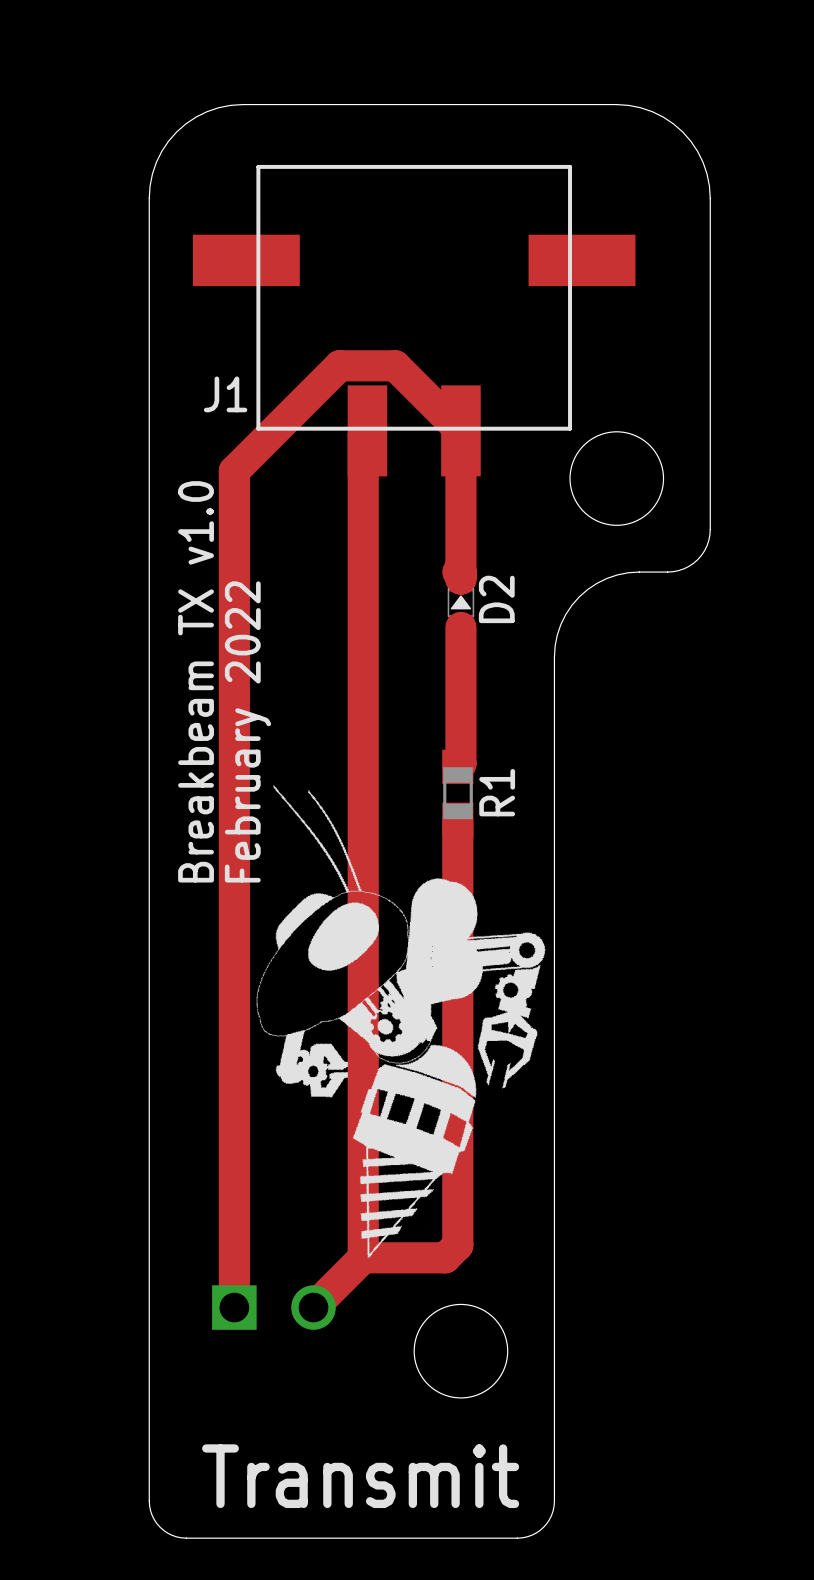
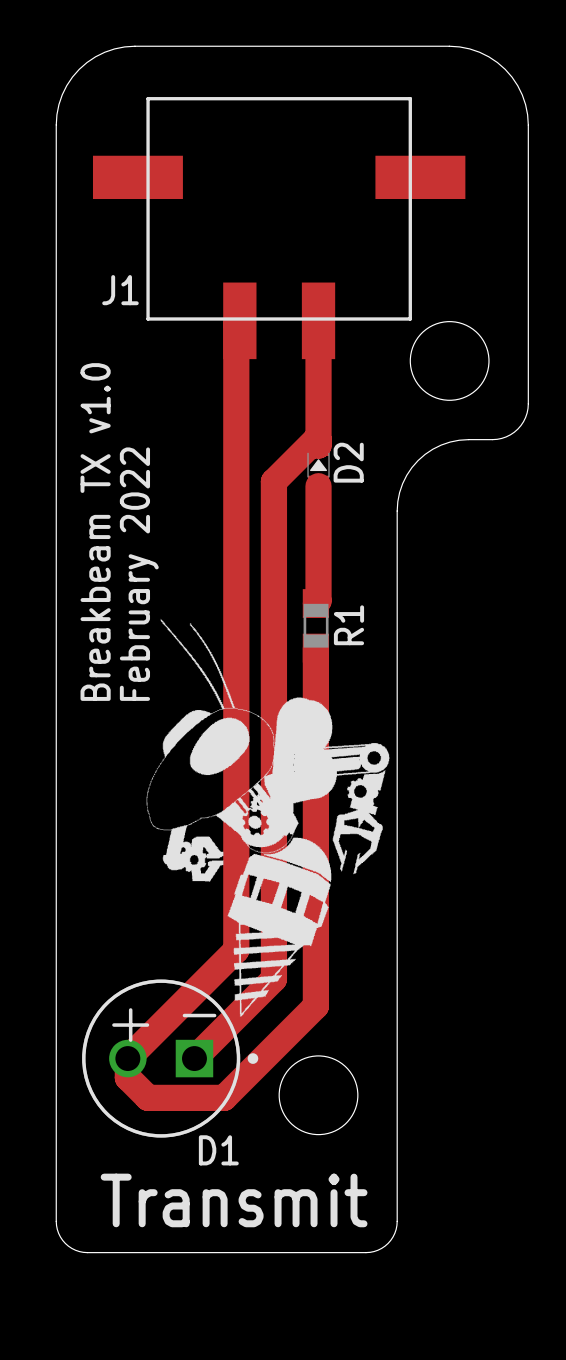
top track: (460, 430) (395, 365) (339, 365) (234, 471) (234, 1307) -> none
top track: none -> (315, 439) (273, 481) (273, 979) (236, 1016)
top track: (363, 1178) (363, 1257) (445, 1257) -> (236, 950) (127, 1058) (127, 1077) (148, 1097) (224, 1097) (305, 1016)
text: none -> _ (199, 1015)
text: none -> + (130, 1025)
D1 side: bottom (273, 1307) -> top (170, 1058)

